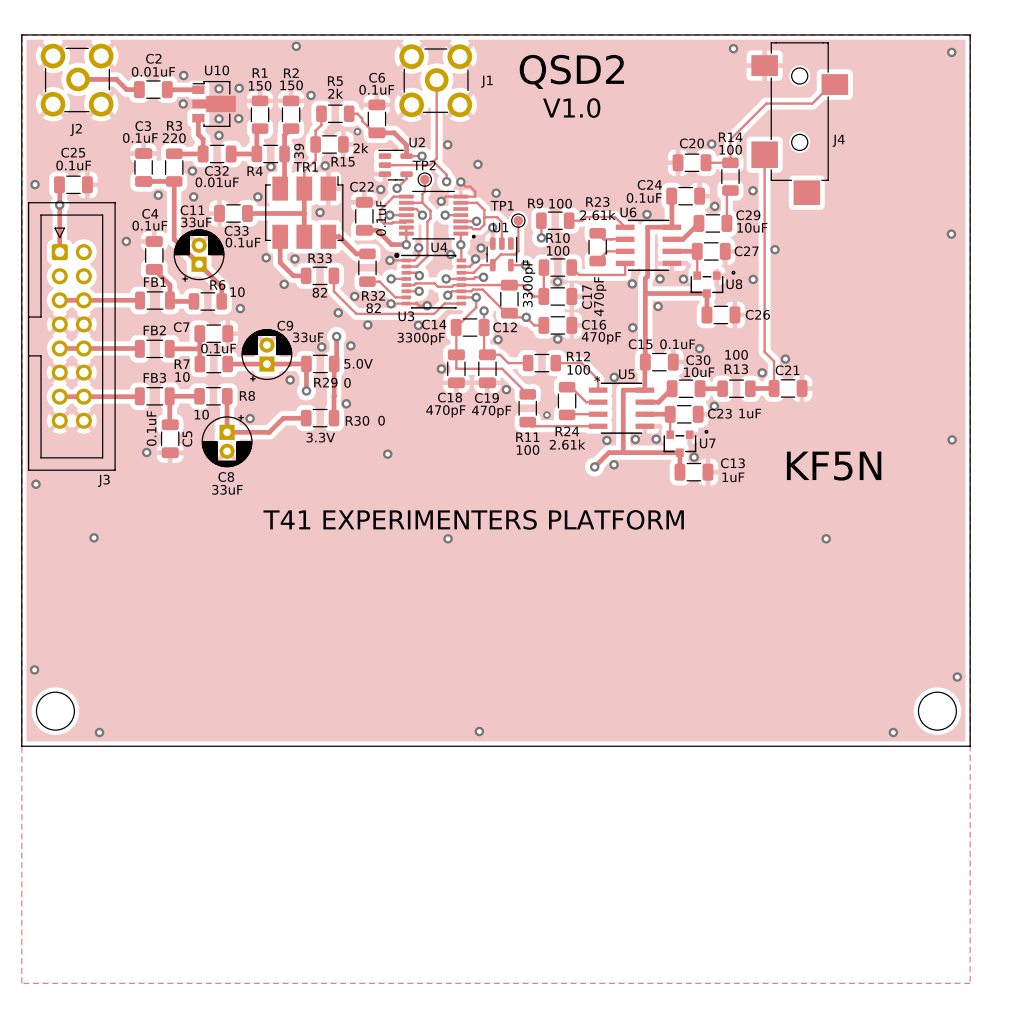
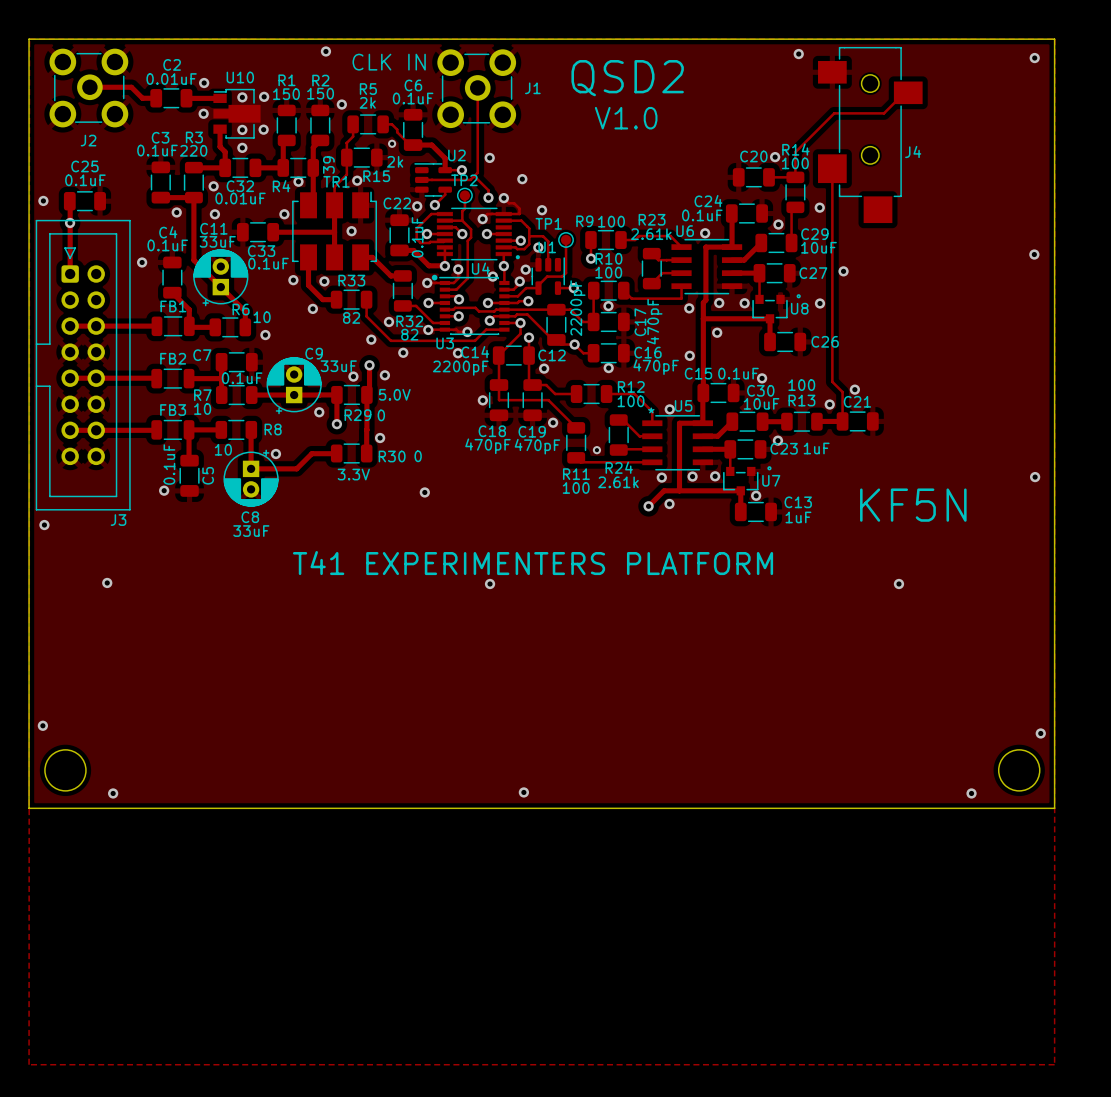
text: none -> CLK IN (389, 62)
C12 value: 3300pF (529, 283) -> 2200pF (577, 308)
C14 value: 3300pF (421, 338) -> 2200pF (460, 368)

